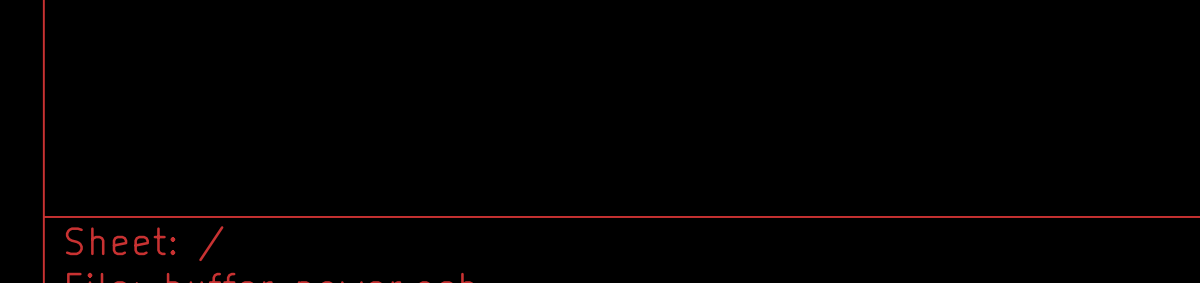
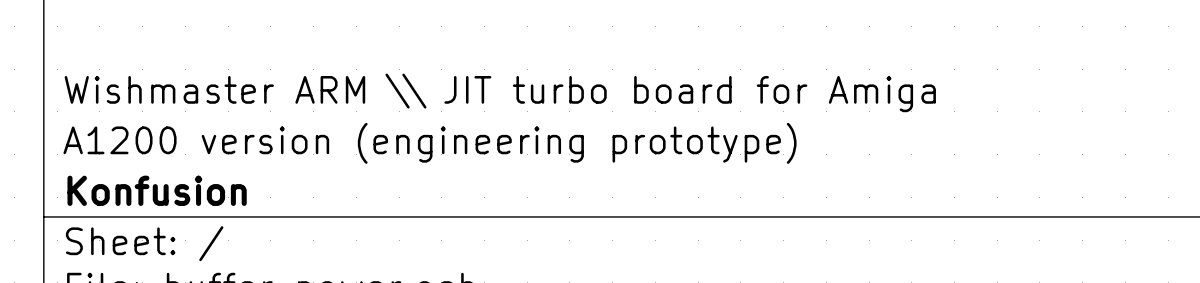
title block: none -> Wishmaster ARM \\ JIT turbo board for Amiga (500, 92)
title block: none -> A1200 version (engineering prototype) (430, 143)
title block: none -> Konfusion (157, 190)

